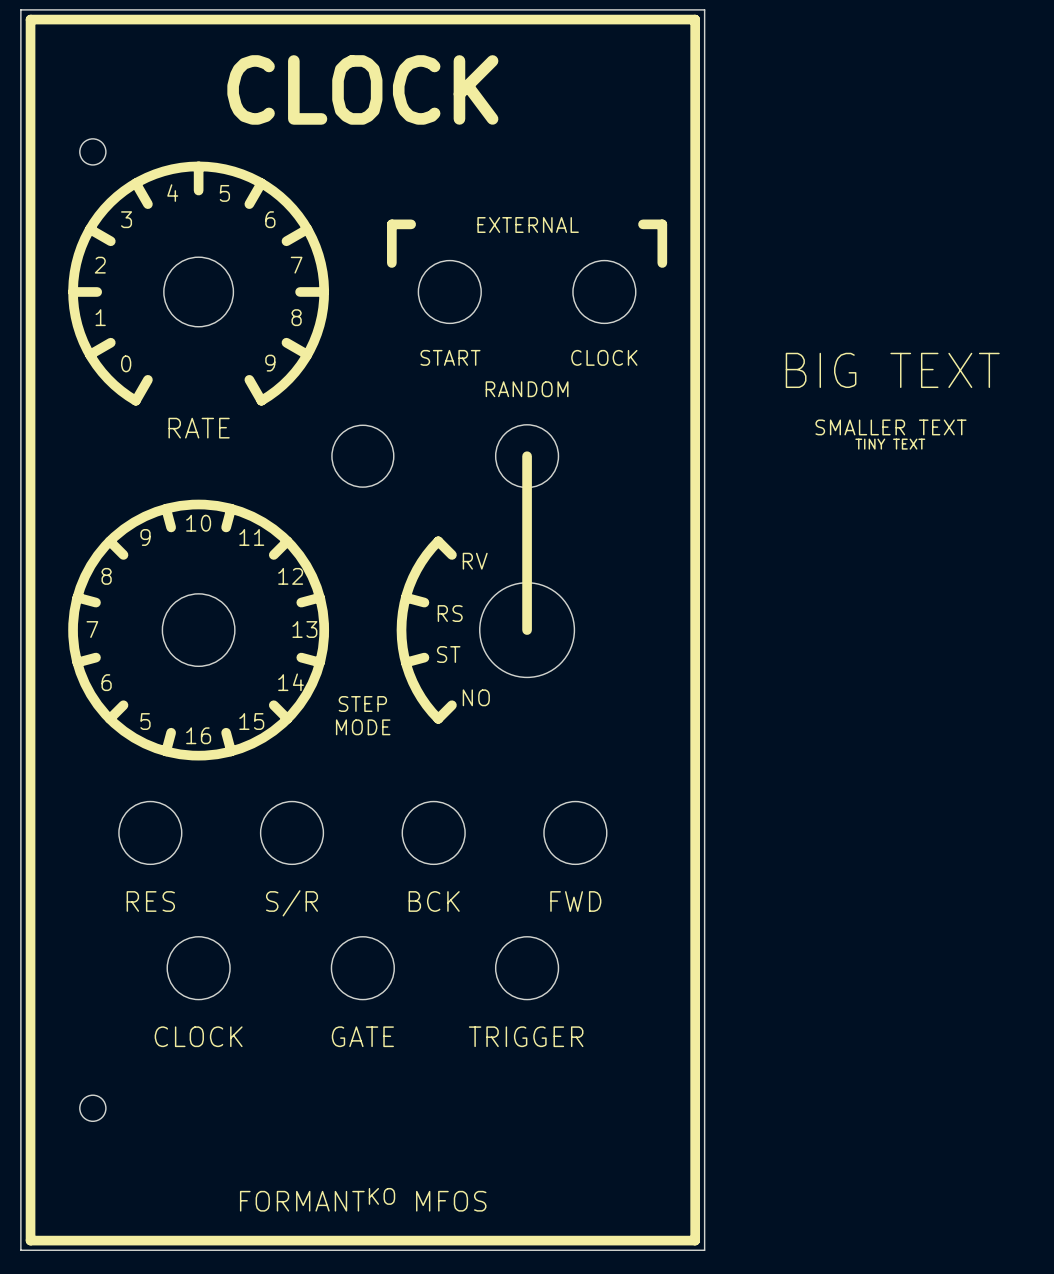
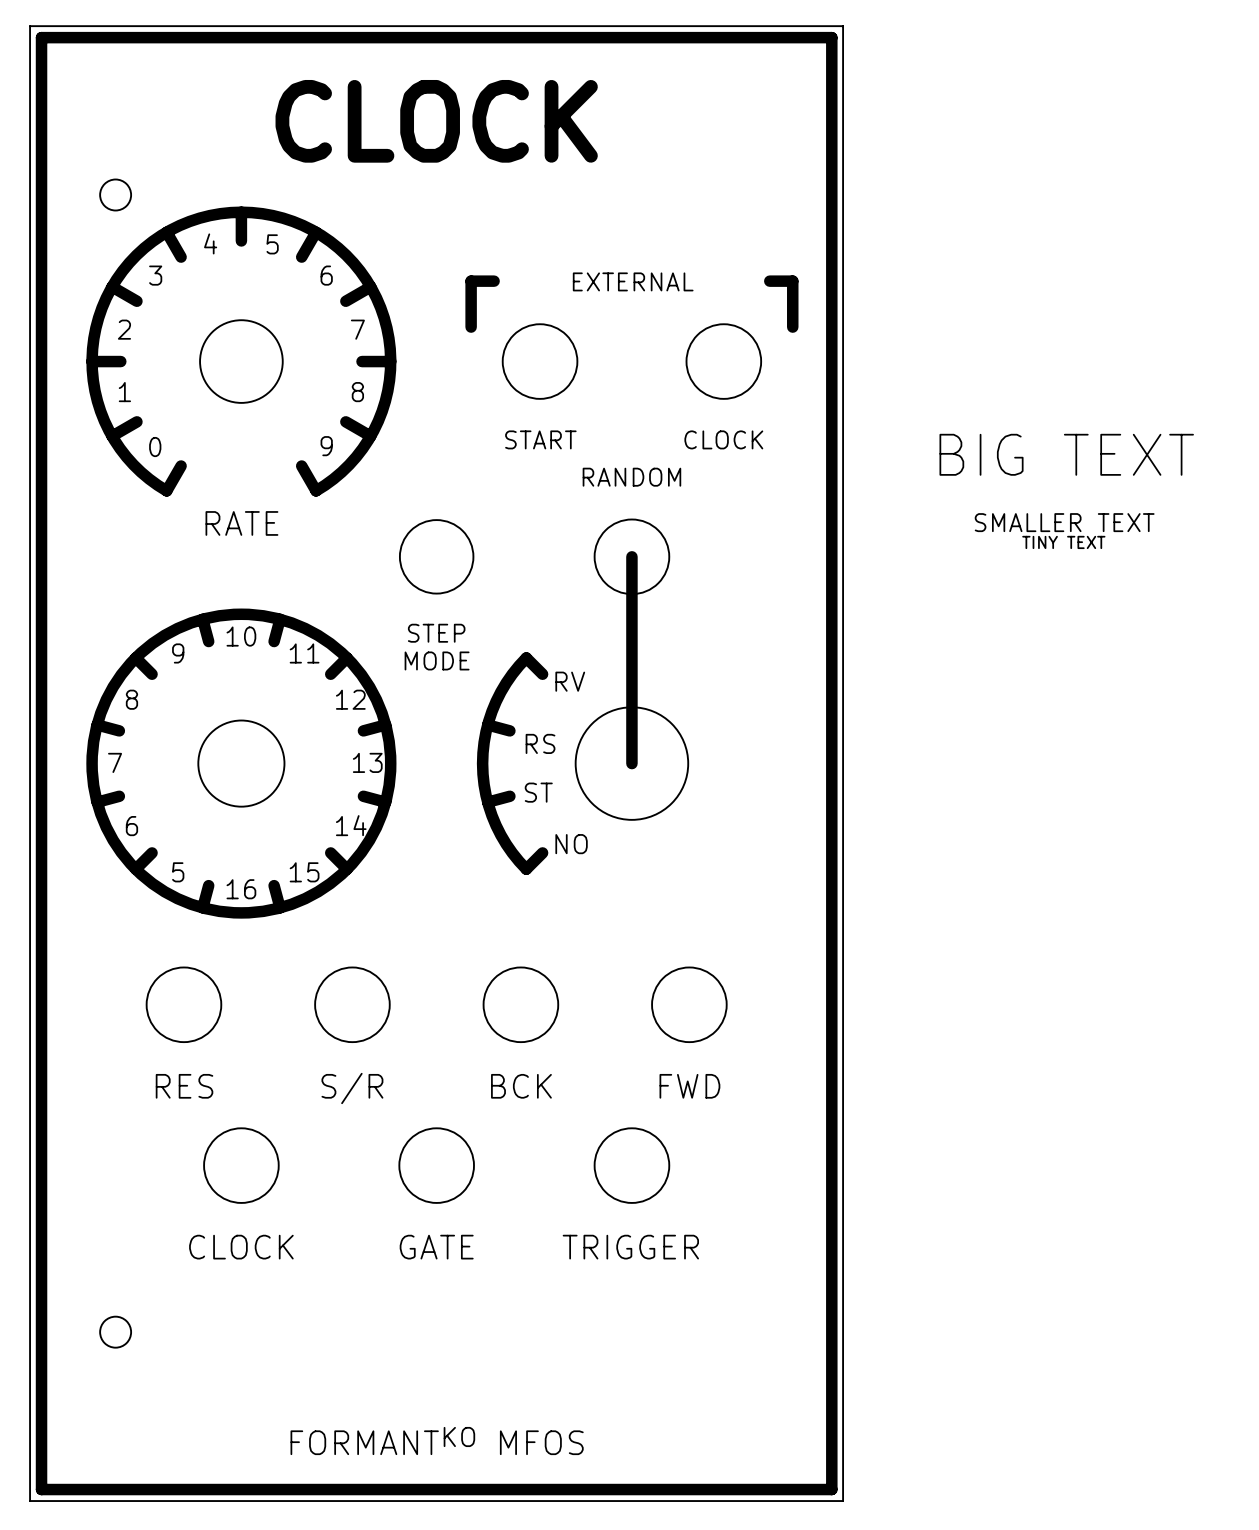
text position: STEP (362, 703) -> STEP (436, 633)
text position: MODE (363, 727) -> MODE (437, 660)

